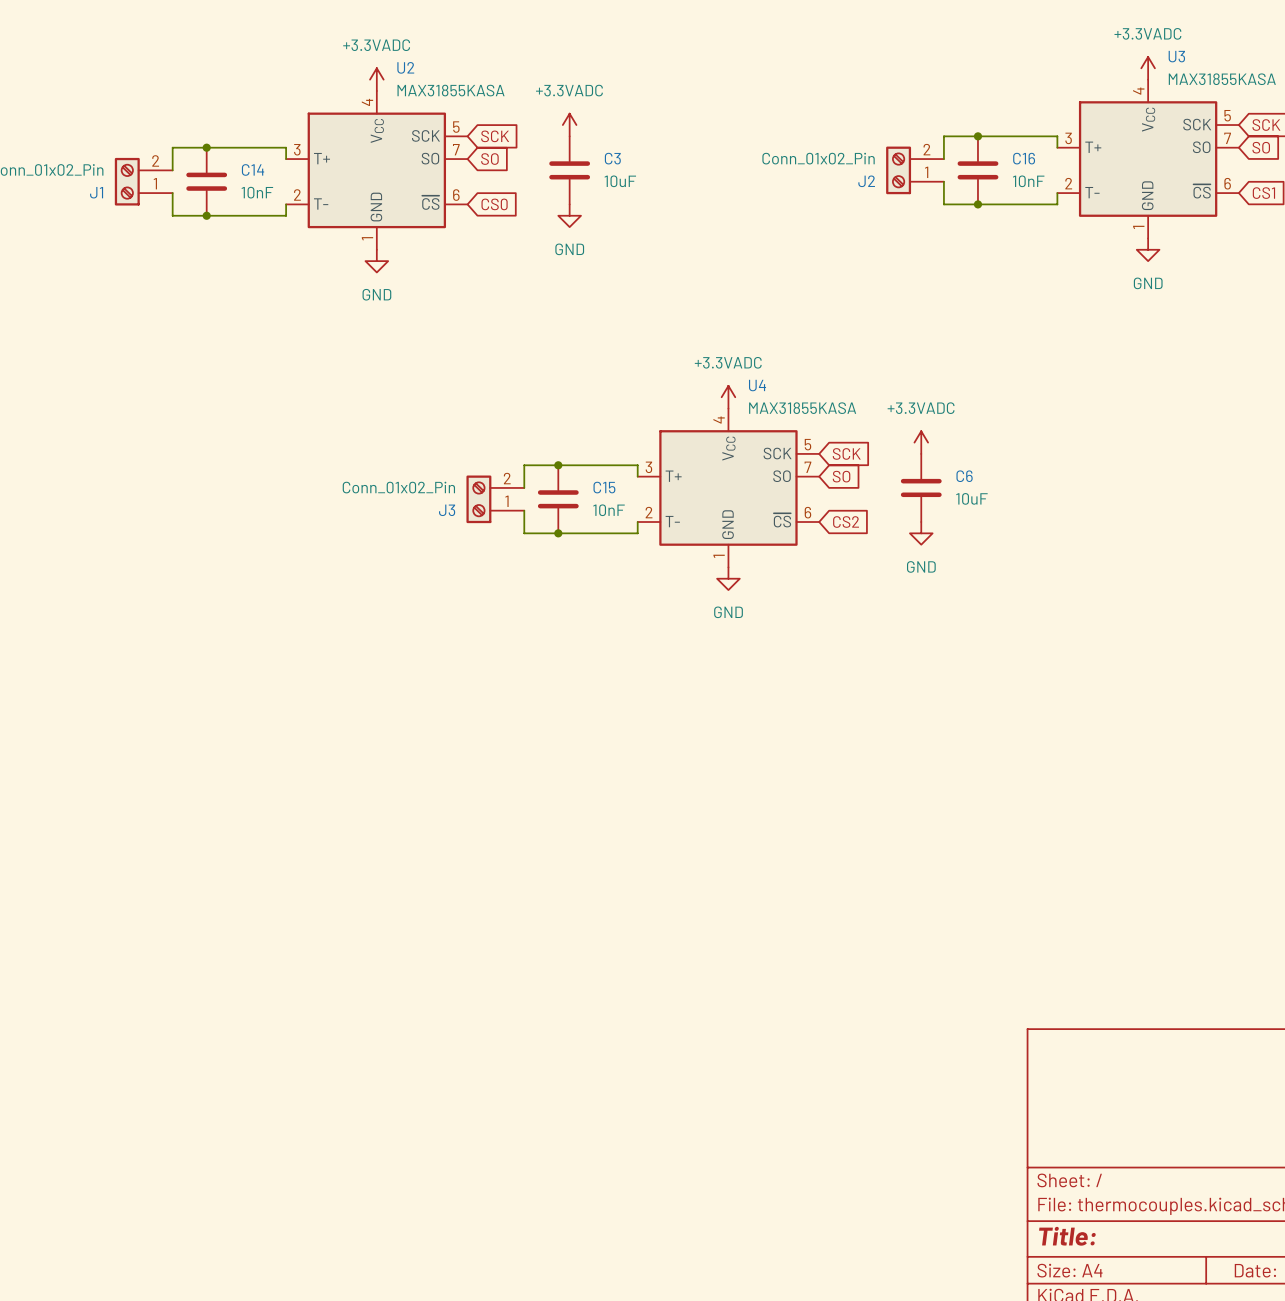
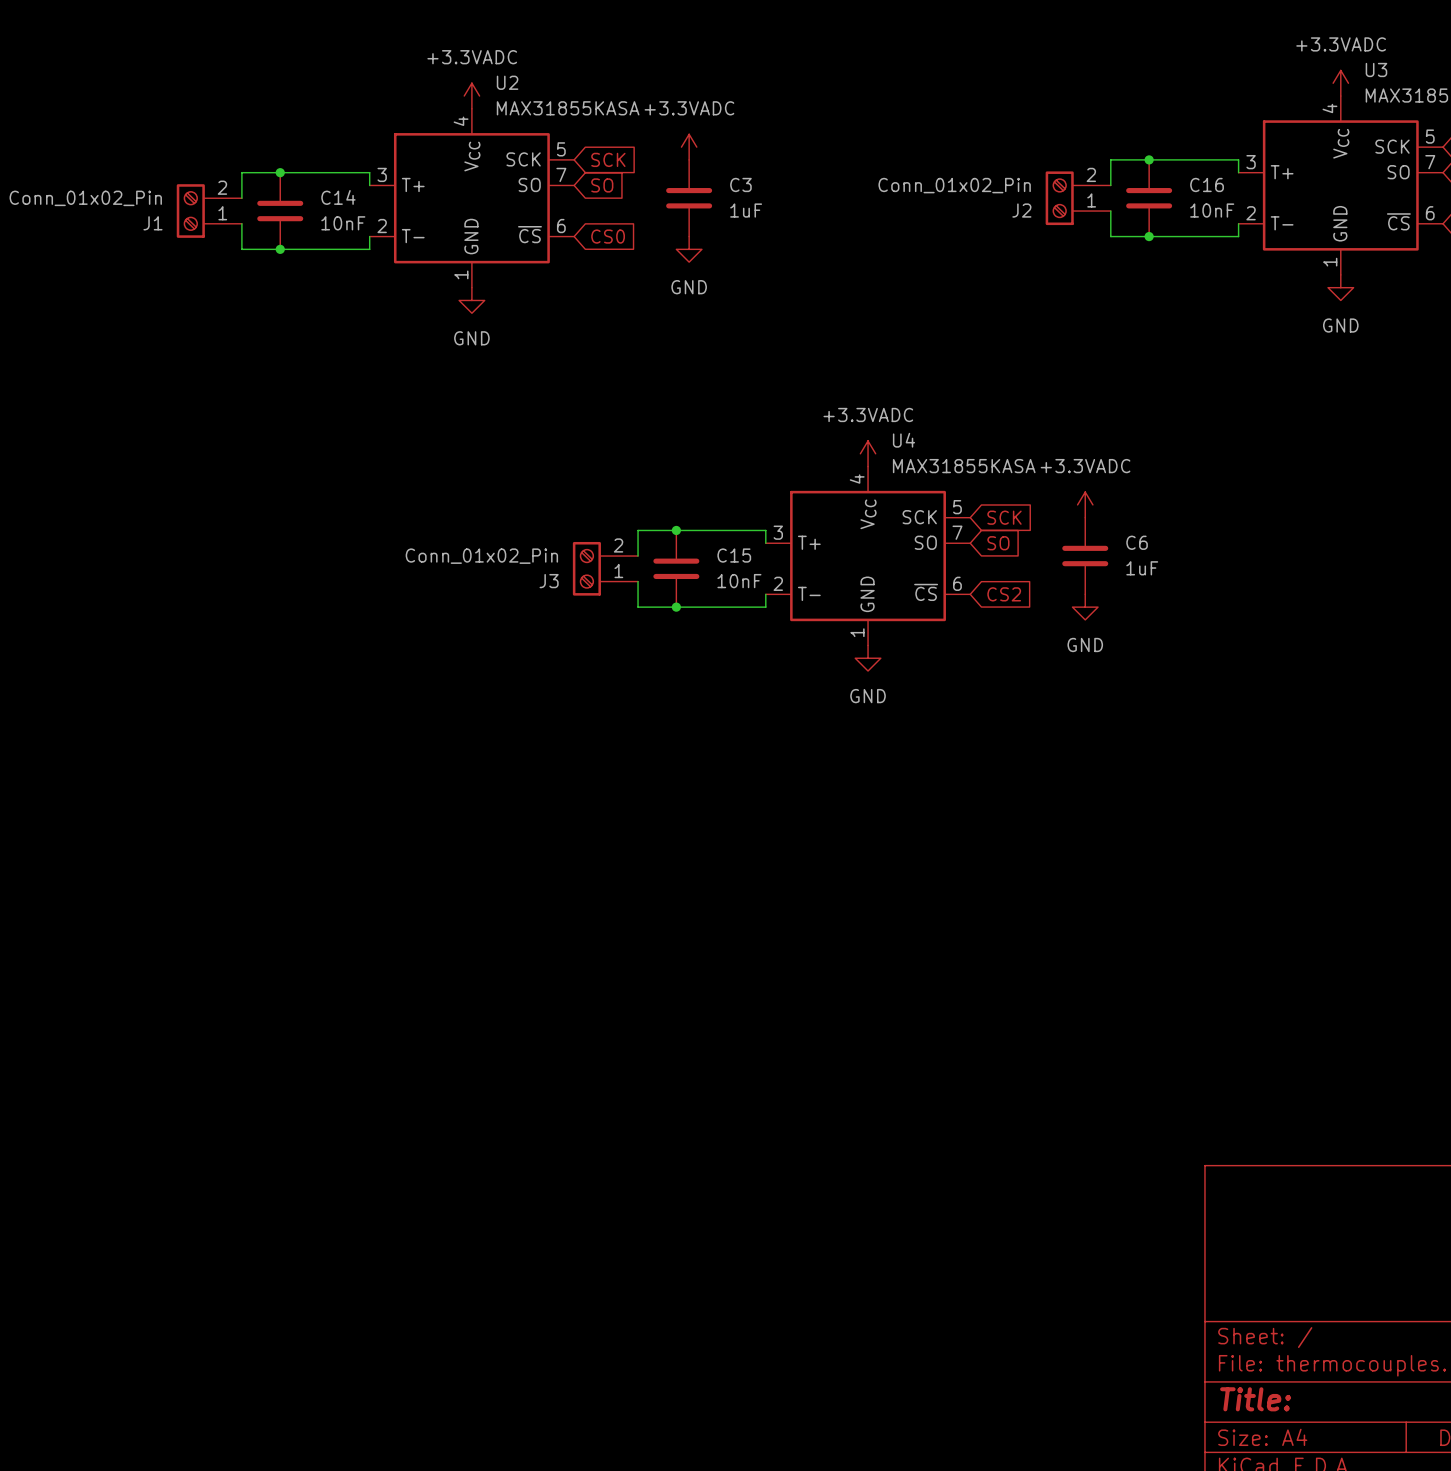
C3 value: 10uF (620, 181) -> 1uF (746, 210)
C6 value: 10uF (971, 498) -> 1uF (1142, 568)

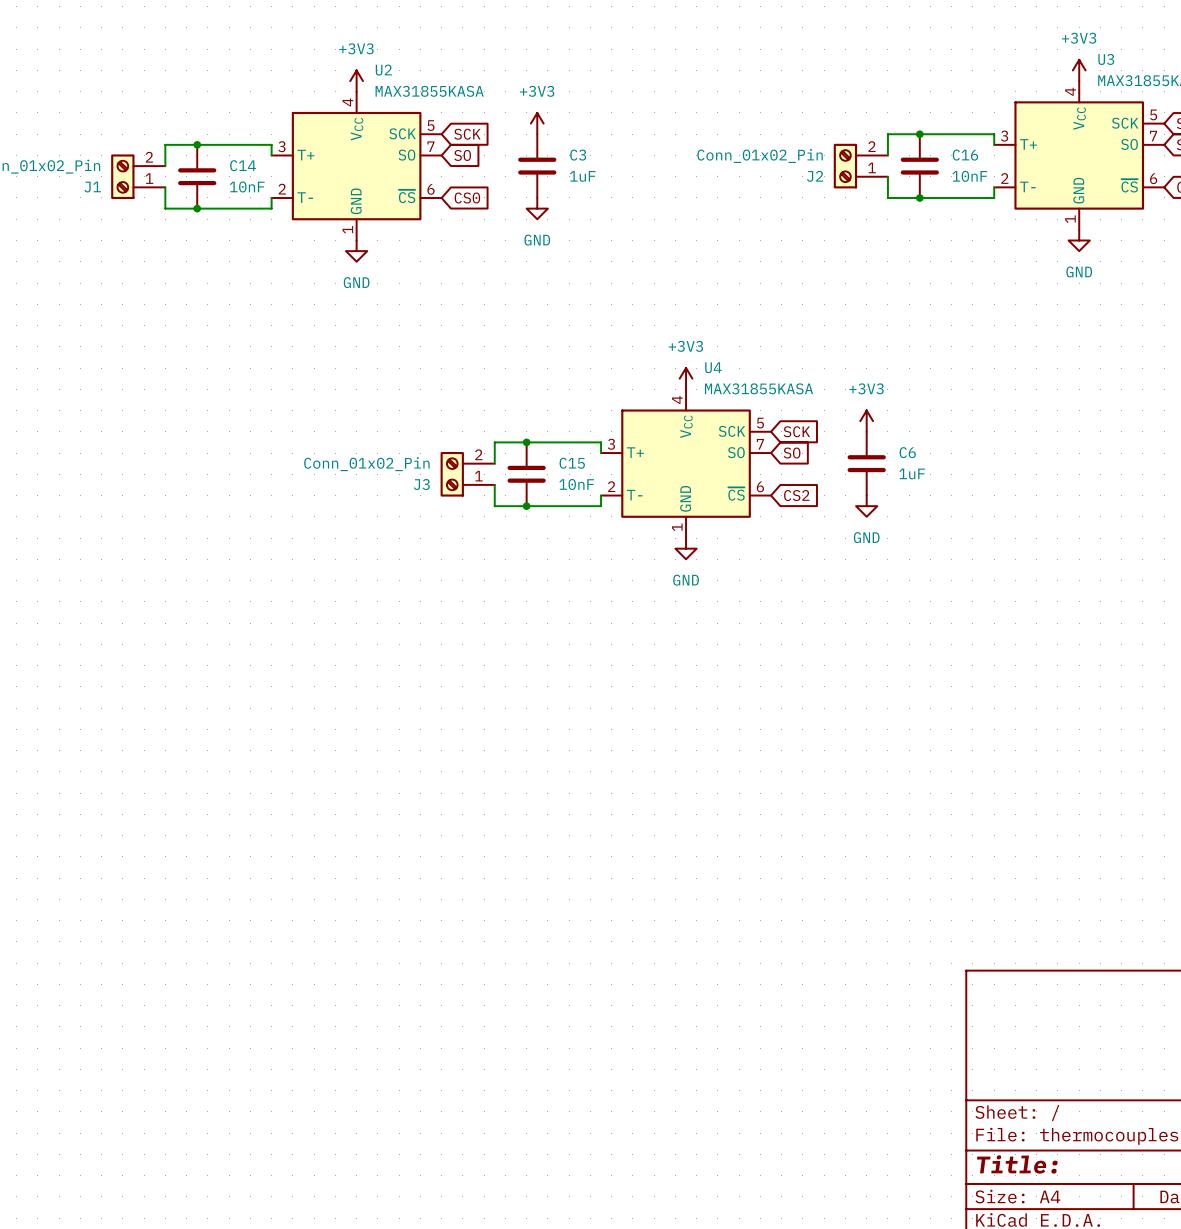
power symbol: +3.3VADC (1340, 83) -> +3V3 (1079, 70)
power symbol: +3.3VADC (471, 96) -> +3V3 (356, 81)
power symbol: +3.3VADC (689, 147) -> +3V3 (537, 123)
power symbol: +3.3VADC (868, 453) -> +3V3 (686, 378)
power symbol: +3.3VADC (1085, 504) -> +3V3 (866, 421)

